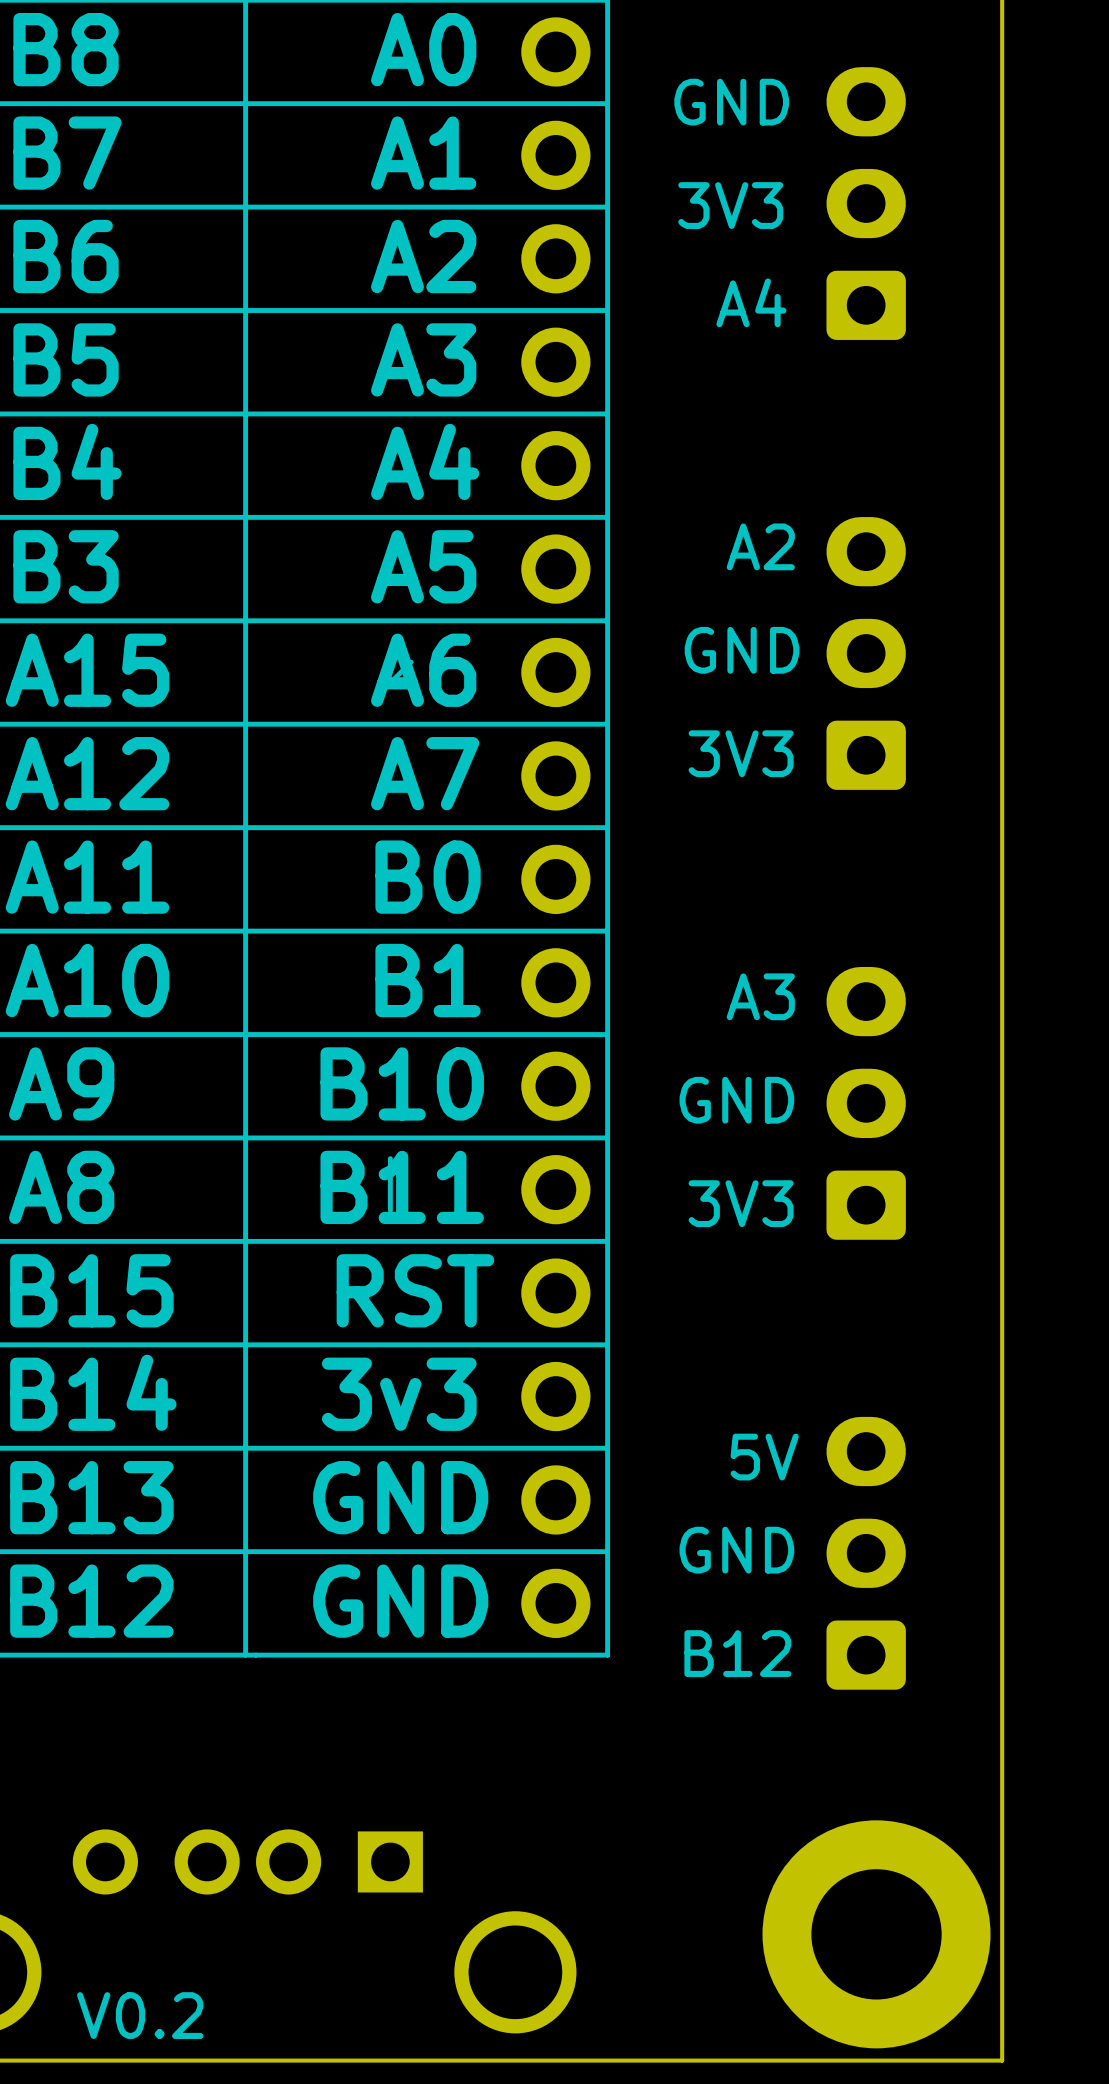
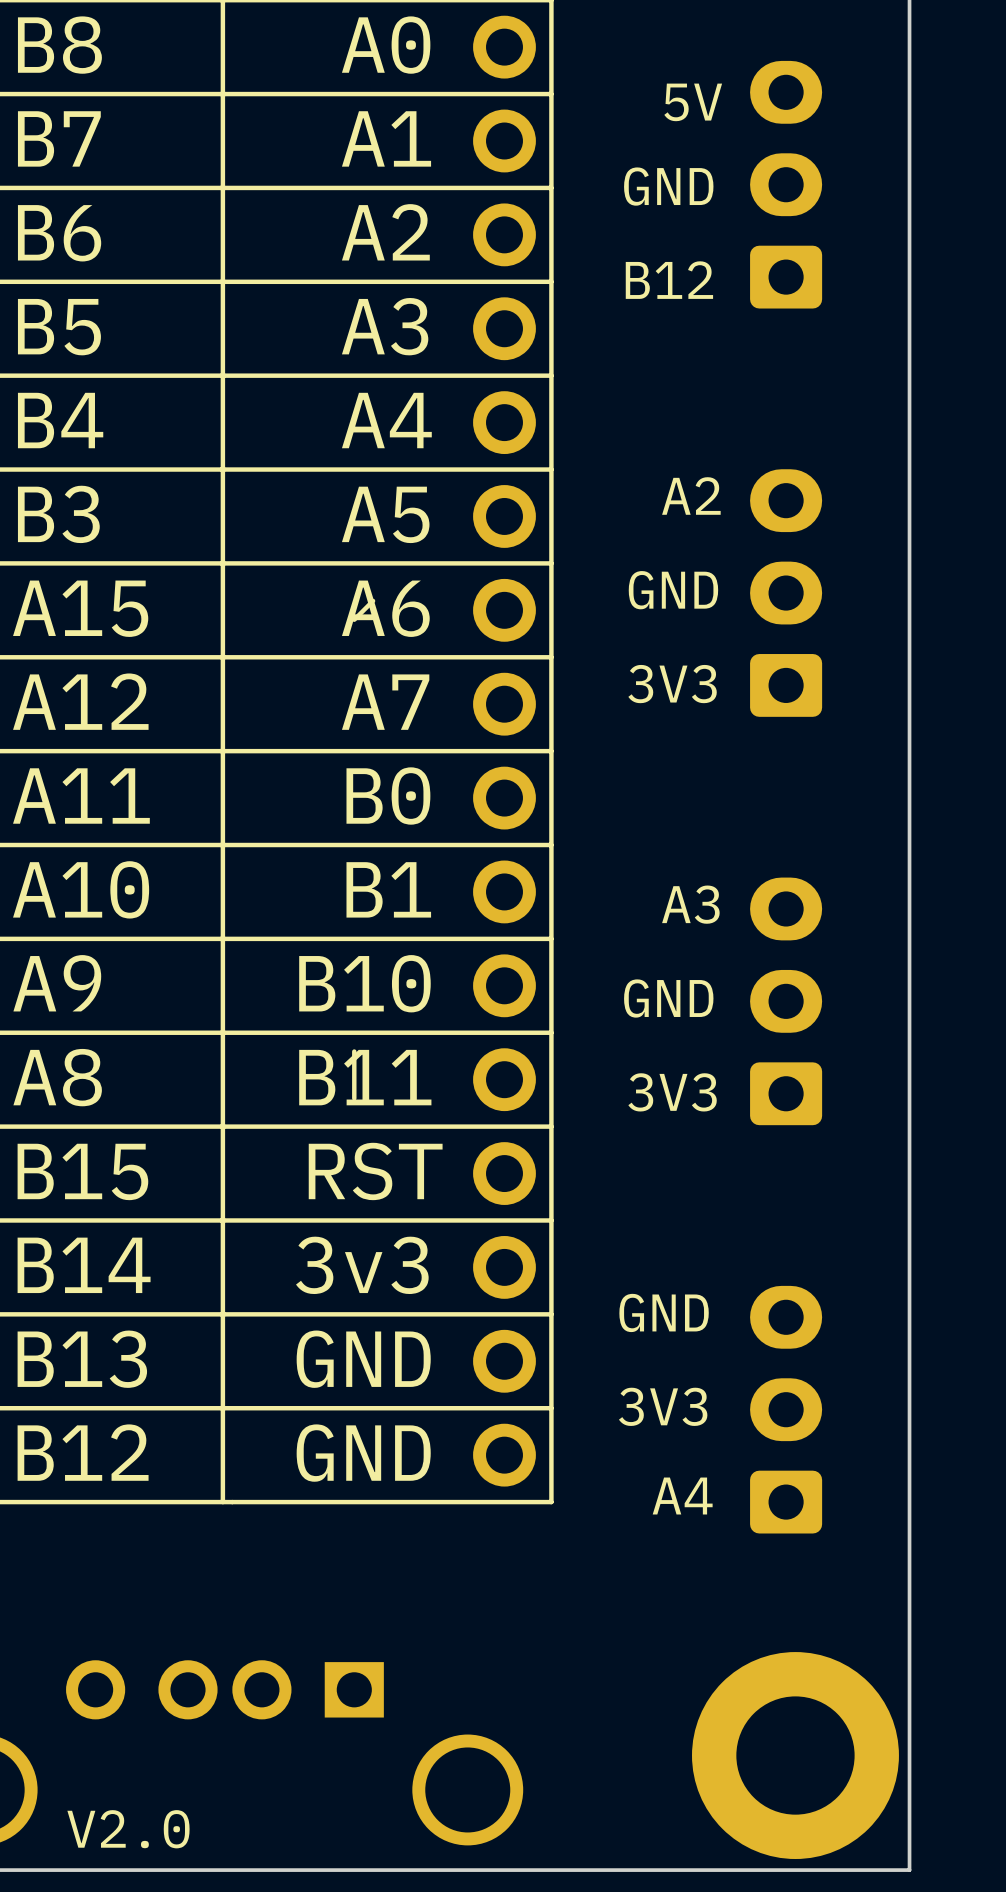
text: GND (731, 102) -> 5V (693, 102)
text: 3V3 (730, 205) -> GND (668, 186)
text: A4 (751, 302) -> B12 (669, 280)
text: 5V (764, 1457) -> GND (664, 1312)
text: GND (736, 1550) -> 3V3 (663, 1406)
text: B12 (737, 1653) -> A4 (682, 1496)
text: V0.2 (140, 2015) -> V2.0 (128, 1829)

